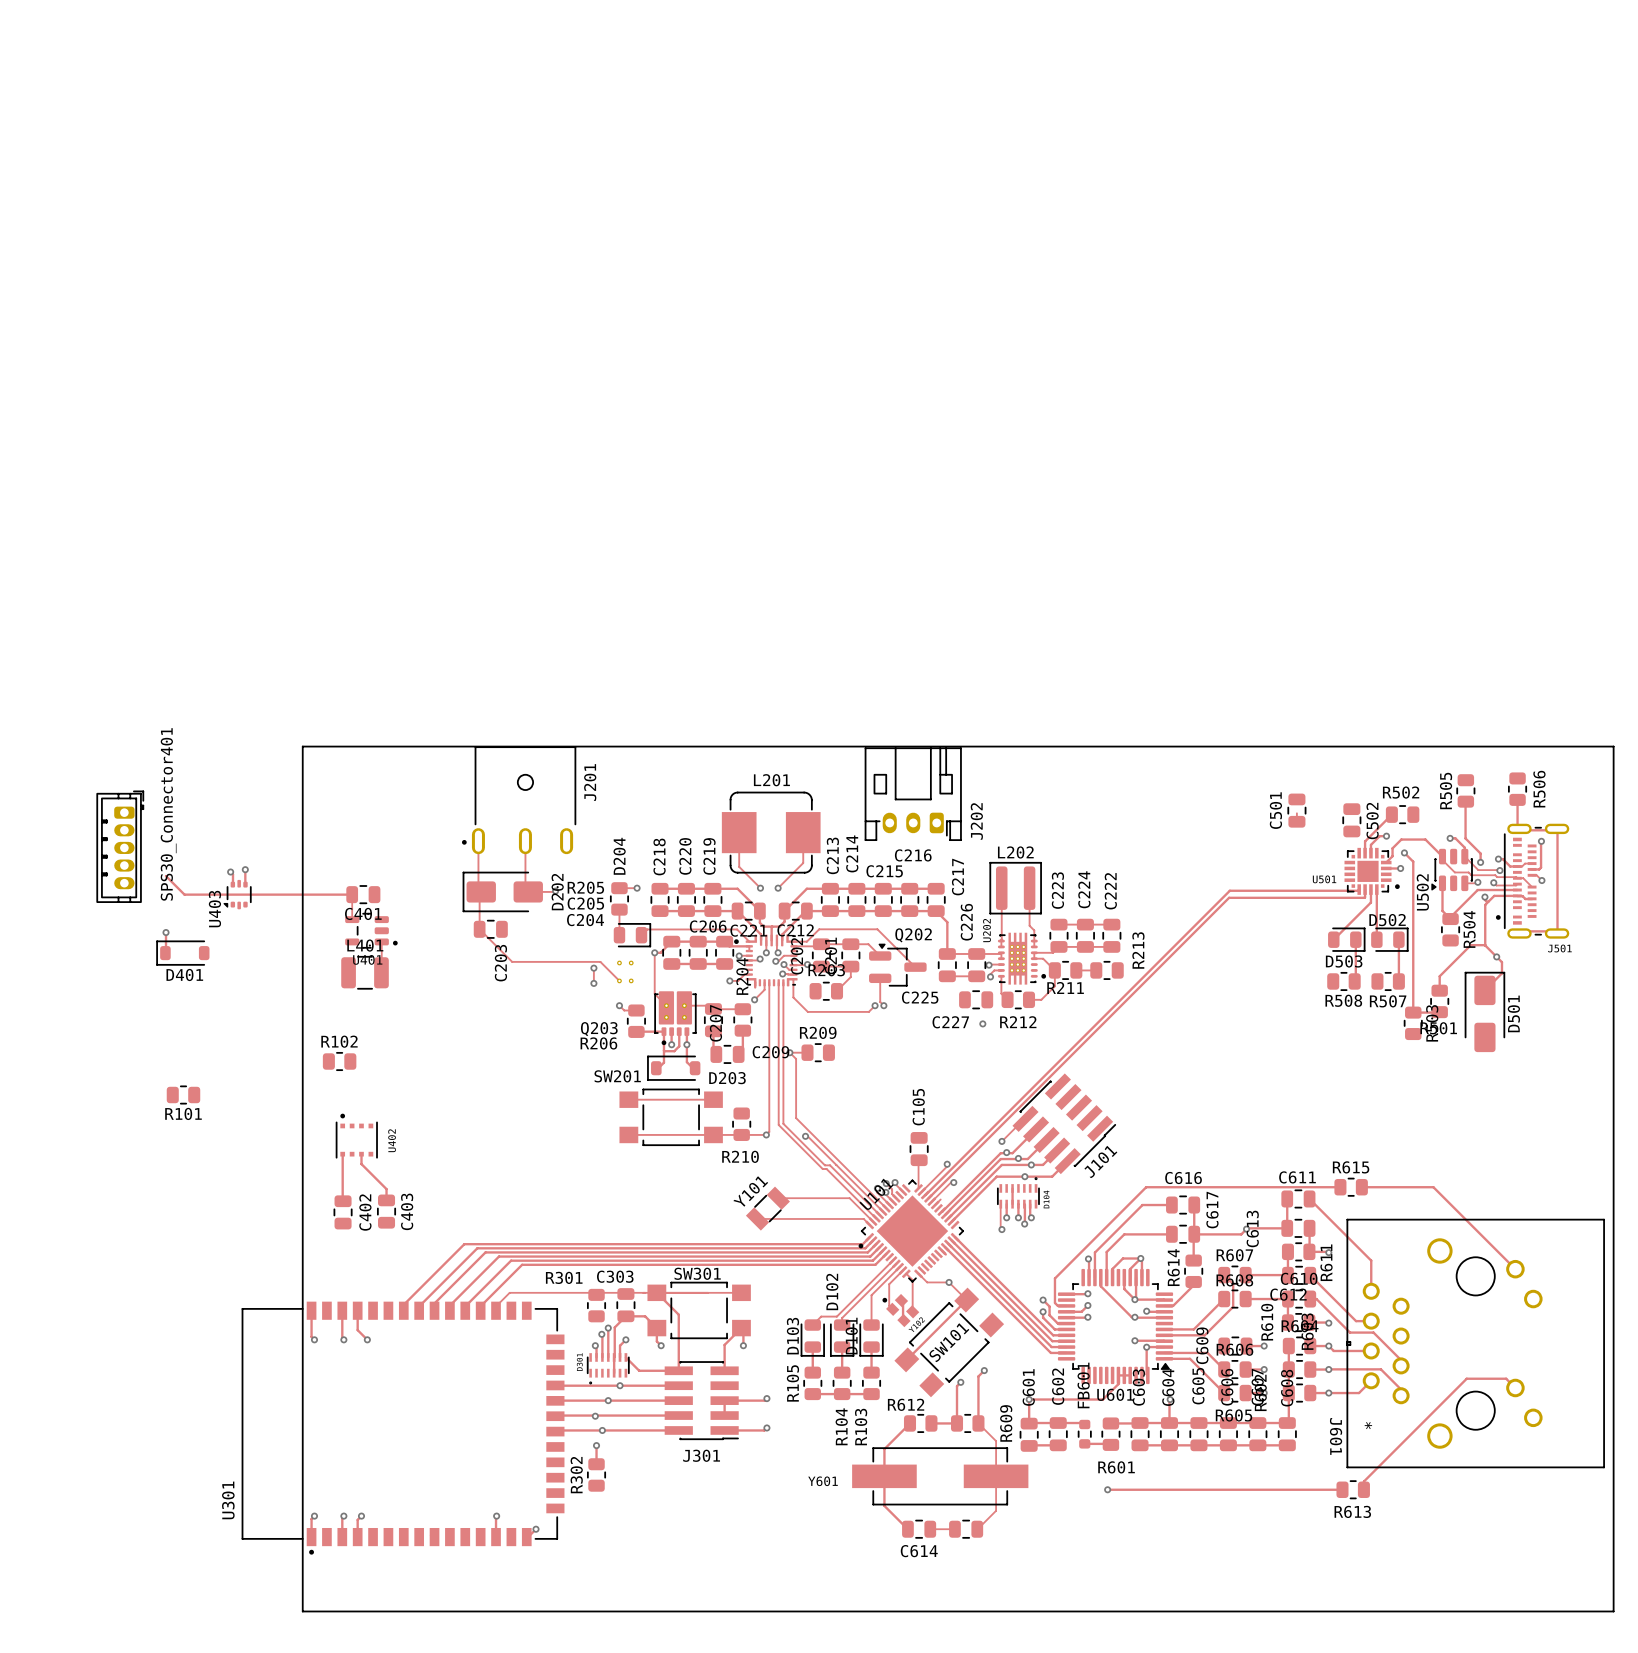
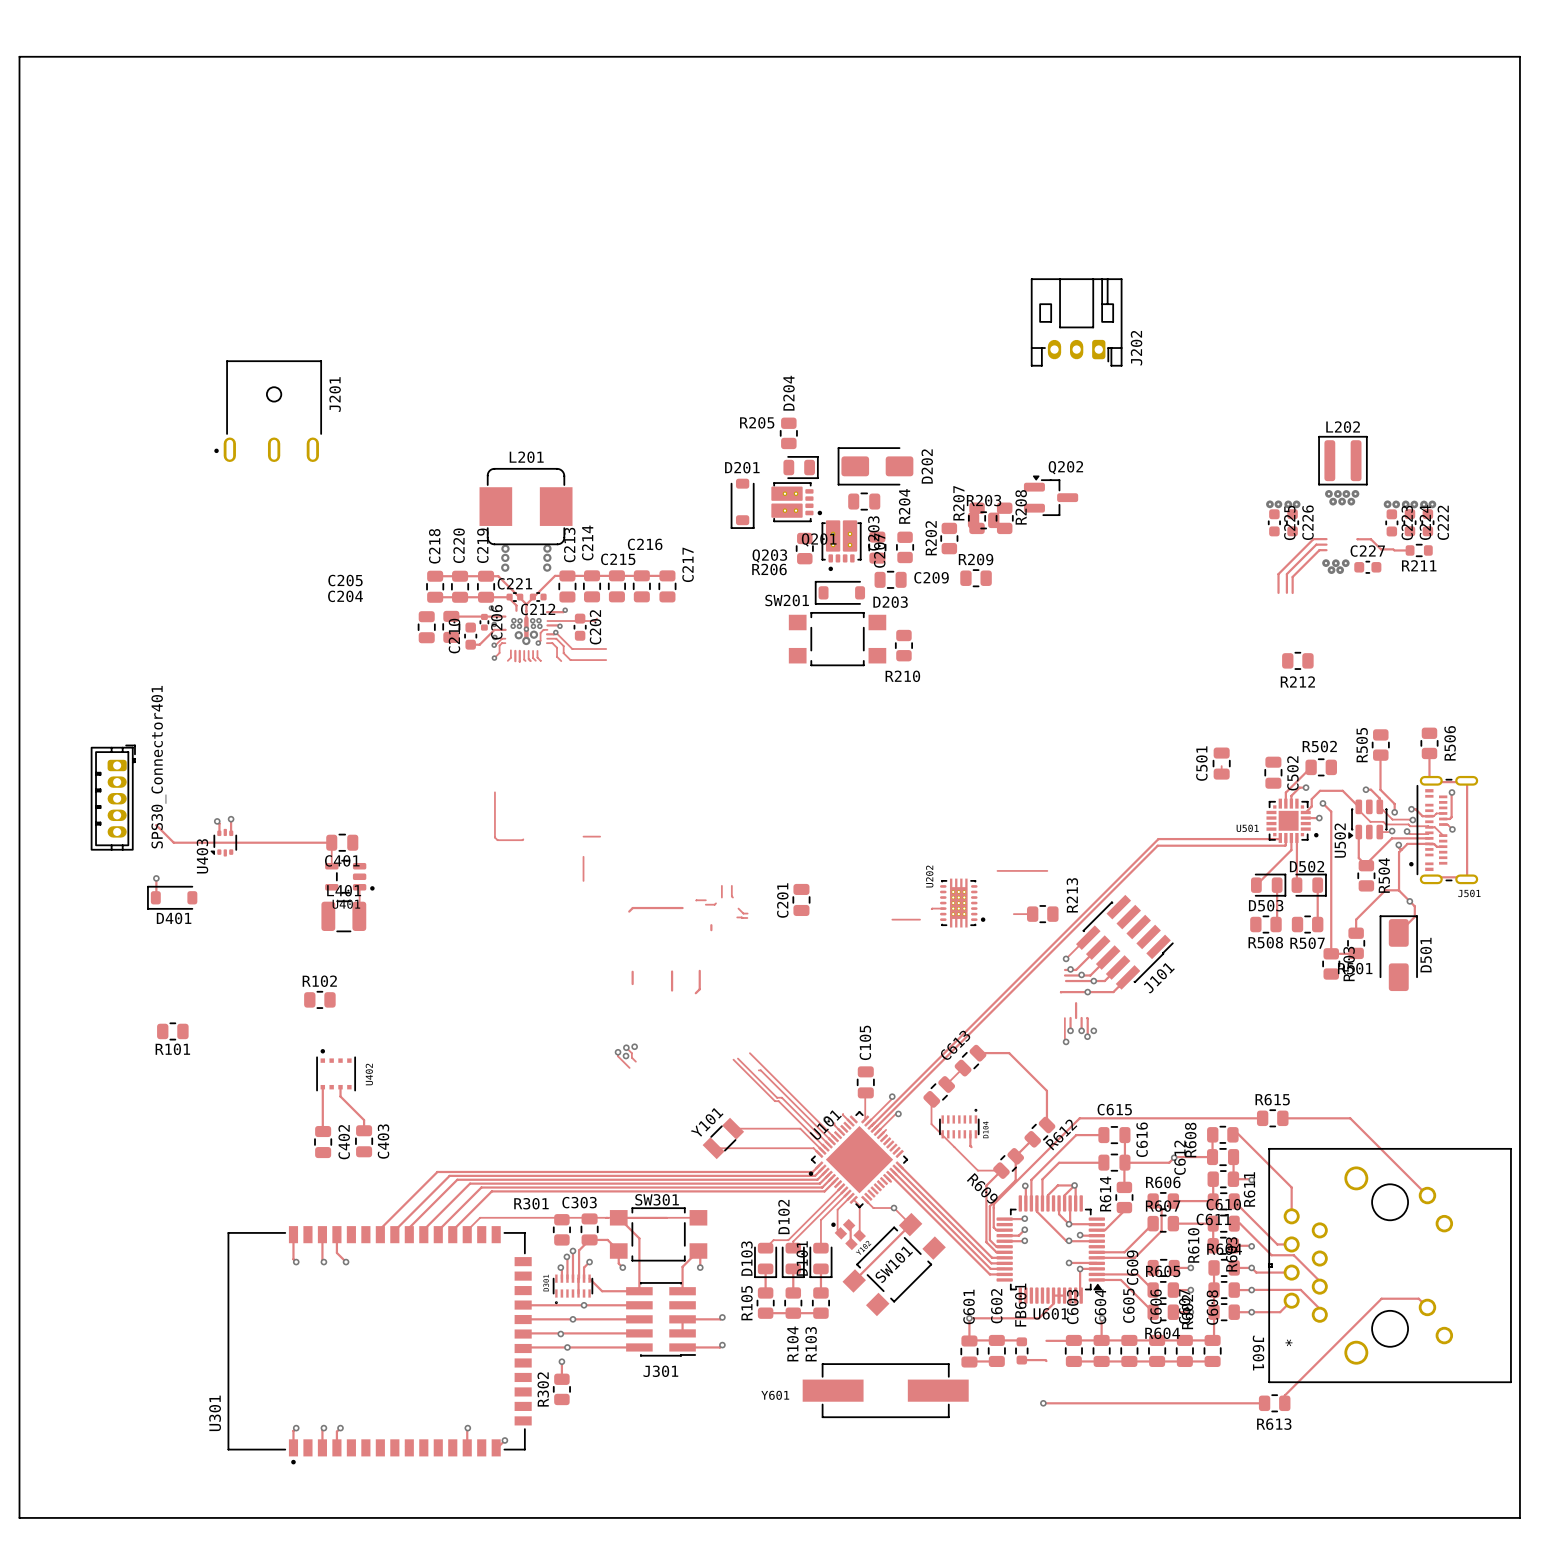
via: none -> (1328, 493)
via: none -> (1337, 493)
via: none -> (1346, 493)
via: none -> (1355, 493)
via: none -> (1333, 501)
via: none -> (1342, 501)
via: none -> (1351, 501)
Q201: none -> (796, 502)
D201: none -> (742, 503)
via: none -> (1269, 504)
via: none -> (1278, 504)
via: none -> (1288, 504)
via: none -> (1296, 504)
via: none -> (1387, 504)
via: none -> (1396, 504)
via: none -> (1405, 504)
via: none -> (1414, 504)
via: none -> (1424, 504)
via: none -> (1432, 504)
R207: none -> (977, 518)
R208: none -> (1004, 518)
R202: none -> (949, 538)
track: none -> (1326, 539) (1313, 539) (1278, 574) (1278, 592)
track: none -> (1357, 539) (1370, 539) (1381, 549) (1410, 550)
track: none -> (1326, 544) (1316, 544) (1286, 574) (1286, 592)
via: none -> (505, 548)
via: none -> (547, 548)
track: none -> (1326, 550) (1319, 550) (1292, 576) (1292, 592)
via: none -> (505, 557)
via: none -> (547, 557)
via: none -> (1326, 563)
via: none -> (1335, 563)
via: none -> (1345, 563)
via: none -> (505, 567)
via: none -> (547, 567)
via: none -> (1331, 570)
via: none -> (1340, 570)
track: none -> (435, 576) (498, 576) (526, 604)
track: none -> (667, 576) (555, 575) (526, 604) (526, 640)
track: none -> (435, 597) (508, 597) (516, 605) (516, 610)
via: none -> (491, 608)
track: none -> (565, 610) (563, 612) (547, 612)
via: none -> (565, 610)
track: none -> (451, 616) (505, 616)
track: none -> (597, 618) (594, 621) (547, 621)
via: none -> (513, 620)
via: none -> (538, 620)
via: none -> (520, 620)
via: none -> (532, 620)
via: none -> (494, 624)
track: none -> (547, 625) (559, 626)
via: none -> (513, 626)
via: none -> (519, 626)
via: none -> (533, 626)
via: none -> (539, 626)
via: none -> (559, 626)
via: none -> (526, 629)
track: none -> (505, 629) (494, 629) (479, 644) (470, 644)
track: none -> (547, 629) (543, 629) (540, 632) (540, 640) (538, 643)
via: none -> (555, 632)
via: none -> (533, 634)
track: none -> (547, 634) (555, 632) (572, 649) (606, 649)
via: none -> (518, 635)
C210: none -> (470, 636)
via: none -> (494, 637)
track: none -> (505, 638) (502, 638) (494, 645)
track: none -> (547, 638) (556, 638) (563, 646) (563, 653)
via: none -> (526, 640)
track: none -> (505, 643) (499, 645) (499, 652) (494, 658)
via: none -> (538, 643)
track: none -> (546, 643) (552, 643) (557, 647) (557, 656) (561, 661)
via: none -> (494, 645)
track: none -> (510, 650) (510, 657) (507, 660)
track: none -> (515, 650) (515, 661)
track: none -> (519, 650) (519, 661)
track: none -> (524, 650) (525, 660)
track: none -> (528, 650) (528, 659) (530, 661)
track: none -> (533, 650) (533, 658) (535, 660)
track: none -> (537, 650) (537, 657) (540, 660)
track: none -> (563, 653) (570, 660) (606, 660)
via: none -> (494, 658)
board edge: (1613, 746) (302, 746) (302, 1611) -> (1519, 703) (1519, 56) (19, 56) (19, 1517) (285, 1517)
J202 position: (913, 794) -> (1076, 322)
J201 position: (519, 800) -> (268, 411)
track: (739, 832) (739, 866) (760, 888) -> none
L201 position: (771, 832) -> (526, 506)
track: (803, 832) (803, 863) (778, 888) -> none
track: (478, 841) (478, 889) (481, 891) (479, 929) (512, 961) (600, 961) (619, 980) -> none
via: (637, 888) -> none
track: (660, 888) (737, 888) (759, 911) (759, 922) (763, 926) (779, 926) (784, 921) (784, 911) (806, 888) (936, 888) -> none
via: (760, 888) -> none
via: (778, 888) -> none
track: (1001, 888) (1001, 946) -> none
L202 position: (1015, 888) -> (1342, 460)
track: (1029, 888) (1029, 925) (1034, 930) (1034, 946) -> none
C224 name position: C224 (1084, 889) -> C224 (1425, 522)
C223 name position: C223 (1057, 890) -> C223 (1407, 522)
D202 position: (502, 891) -> (875, 466)
via: (555, 891) -> none
C222 name position: C222 (1110, 891) -> C222 (1443, 522)
R205 position: (619, 898) -> (788, 433)
C218 position: (660, 899) -> (435, 586)
C220 position: (686, 899) -> (460, 586)
C219 position: (712, 899) -> (486, 586)
C213 position: (830, 899) -> (567, 586)
C214 position: (856, 899) -> (592, 586)
C215 position: (883, 899) -> (616, 586)
C216 position: (909, 899) -> (641, 586)
C217 position: (936, 899) -> (667, 586)
C221 footprint: [731, 901, 766, 921] -> [506, 592, 524, 602]
C212 footprint: [778, 901, 813, 921] -> [529, 592, 547, 602]
track: (660, 911) (737, 911) (761, 934) (761, 940) -> none
C223 footprint: [1049, 918, 1069, 953] -> [1385, 509, 1399, 537]
C224 footprint: [1076, 918, 1095, 953] -> [1403, 509, 1417, 537]
C222 footprint: [1102, 918, 1122, 953] -> [1421, 509, 1435, 537]
C226 name position: C226 (966, 922) -> C226 (1308, 522)
C206 name position: C206 (708, 926) -> C206 (496, 622)
track: (772, 926) (771, 940) -> none
C203 position: (490, 929) -> (864, 501)
C221 name position: C221 (748, 930) -> C221 (514, 583)
D204 position: (632, 935) -> (800, 467)
track: (641, 935) (647, 929) (737, 929) (749, 941) -> none
C206 footprint: [715, 935, 734, 970] -> [479, 613, 490, 631]
C202 footprint: [812, 938, 831, 973] -> [573, 613, 587, 641]
track: (782, 940) (782, 934) (805, 911) (936, 911) (947, 922) (947, 953) (1001, 952) (1001, 958) -> none
track: (793, 941) (806, 941) (819, 929) (877, 929) (915, 967) -> none
track: (1111, 946) (1058, 946) (1053, 952) (1034, 952) (1034, 958) (1043, 958) (1054, 970) (1054, 986) (1041, 999) (1029, 999) -> none
C225 footprint: [937, 948, 957, 983] -> [1268, 509, 1281, 537]
C226 footprint: [967, 948, 987, 983] -> [1286, 509, 1299, 537]
track: (749, 951) (749, 946) (729, 946) (724, 941) (671, 941) (660, 952) (654, 952) (654, 993) (666, 1005) -> none
track: (793, 951) (793, 946) (868, 944) (880, 955) -> none
via: (654, 952) -> none
C204 position: (671, 952) -> (426, 627)
C205 position: (698, 952) -> (451, 626)
via: (766, 952) -> none
via: (778, 952) -> none
via: (739, 955) -> none
track: (793, 955) (784, 955) (775, 961) -> none
C202 name position: C202 (797, 956) -> C202 (595, 627)
via: (760, 959) -> none
part: (765, 960) -> none
via: (775, 961) -> none
R211 footprint: [1048, 961, 1083, 980] -> [1405, 544, 1433, 557]
via: (783, 964) -> none
track: (807, 964) (793, 965) -> none
via: (807, 964) -> none
Q202 position: (897, 965) -> (1051, 495)
via: (989, 965) -> none
track: (821, 966) (850, 966) (850, 977) (837, 991) -> none
track: (593, 968) (593, 983) -> none
via: (593, 968) -> none
track: (1001, 970) (994, 970) (990, 976) -> none
part: (625, 971) -> none
via: (782, 973) -> none
track: (749, 974) (744, 974) (738, 980) (729, 980) -> none
via: (990, 976) -> none
track: (1001, 976) (1001, 993) (1007, 999) -> none
track: (880, 978) (880, 1002) (883, 1005) -> none
track: (793, 979) (793, 997) (807, 1011) (868, 1011) (875, 1005) -> none
via: (729, 980) -> none
track: (764, 982) (764, 989) (754, 999) -> none
track: (769, 982) (769, 1132) (766, 1134) (628, 1134) -> none
track: (778, 982) (778, 1124) -> none
track: (783, 982) (783, 1123) -> none
via: (593, 983) -> none
C227 footprint: [959, 990, 994, 1010] -> [1354, 560, 1382, 574]
R203 position: (826, 991) -> (983, 520)
C225 name position: C225 (920, 997) -> C225 (1289, 522)
via: (754, 999) -> none
R212 position: (1018, 999) -> (1297, 660)
track: (619, 1005) (624, 1010) (636, 1010) -> none
via: (619, 1005) -> none
track: (684, 1005) (707, 1005) (713, 1009) (742, 1009) -> none
via: (875, 1005) -> none
via: (883, 1005) -> none
track: none -> (1098, 947) (1076, 969) (1065, 969)
track: none -> (1108, 957) (1090, 975) (1065, 975)
via: none -> (1066, 958)
Q203 position: (675, 1018) -> (841, 545)
R204 position: (742, 1019) -> (905, 547)
C207 position: (713, 1020) -> (877, 547)
R206 position: (636, 1021) -> (804, 548)
C227 name position: C227 (950, 1022) -> C227 (1367, 551)
via: (982, 1023) -> none
track: none -> (1118, 967) (1104, 981) (1066, 981)
via: none -> (1070, 969)
track: (636, 1031) (663, 1031) (663, 1062) (656, 1068) -> none
track: (679, 1031) (679, 1046) (674, 1051) (663, 1050) -> none
track: (686, 1031) (686, 1062) (695, 1068) -> none
via: none -> (1081, 974)
track: none -> (1128, 977) (1113, 992) (1060, 992)
via: none -> (1093, 981)
via: (671, 1044) -> none
via: (686, 1044) -> none
via: (789, 1052) -> none
track: (807, 1052) (789, 1052) (796, 1058) (796, 1118) -> none
R209 position: (818, 1052) -> (976, 578)
via: none -> (1087, 992)
C209 position: (727, 1054) -> (890, 579)
D203 position: (673, 1068) -> (840, 592)
via: none -> (1070, 1030)
via: none -> (1081, 1030)
via: none -> (1093, 1030)
track: (628, 1099) (713, 1099) -> none
via: none -> (1087, 1036)
via: none -> (1066, 1041)
via: none -> (634, 1046)
via: none -> (626, 1047)
via: none -> (618, 1052)
SW201 position: (671, 1117) -> (837, 639)
track: none -> (978, 1053) (1009, 1053) (1046, 1090) (1046, 1124)
track: (1025, 1118) (1001, 1141) -> (1088, 937) (1066, 958)
via: none -> (626, 1056)
J101 position: (1064, 1123) -> (1124, 942)
R210 position: (741, 1124) -> (903, 645)
C613: none -> (970, 1060)
track: (1036, 1129) (1012, 1153) (1000, 1153) (941, 1211) -> none
track: none -> (963, 1068) (946, 1084)
via: (766, 1134) -> none
via: (805, 1136) -> none
track: (1046, 1140) (1027, 1159) (1000, 1159) (945, 1215) -> none
via: (1001, 1141) -> none
track: (1057, 1150) (1043, 1164) (1001, 1164) (948, 1218) -> none
via: (1006, 1152) -> none
via: (1018, 1158) -> none
part: none -> (939, 1091)
track: (1067, 1161) (1052, 1176) (996, 1176) (951, 1221) -> none
via: (1031, 1164) -> none
via: (1024, 1176) -> none
C616 name: C616 (1183, 1178) -> C615 (1114, 1109)
via: (895, 1182) -> none
track: (886, 1183) (892, 1189) (892, 1194) (896, 1198) -> (626, 1047) (635, 1061)
via: (886, 1183) -> none
track: (877, 1188) (877, 1192) (889, 1205) -> (618, 1052) (618, 1056) (629, 1067)
track: (1012, 1188) (1012, 1204) -> (1076, 1003) (1076, 1018)
via: (885, 1192) -> none
C611: (1298, 1198) -> none
track: (1000, 1204) (1001, 1229) -> (1064, 1018) (1066, 1041)
track: (1006, 1204) (1006, 1217) -> (1070, 1018) (1070, 1030)
track: (1018, 1204) (1018, 1217) -> (1081, 1018) (1081, 1030)
track: (1024, 1204) (1024, 1224) -> (1087, 1018) (1087, 1036)
R608: none -> (1222, 1134)
C617 name: C617 (1212, 1210) -> C616 (1142, 1139)
via: (1006, 1217) -> none
via: (1018, 1217) -> none
via: (1031, 1217) -> none
via: (1024, 1224) -> none
via: (1001, 1229) -> none
C613 name: C613 (1252, 1229) -> C612 (1180, 1157)
R607 name: R607 (1234, 1255) -> R606 (1163, 1182)
R608 name: R608 (1234, 1280) -> R607 (1163, 1206)
C612 name: C612 (1288, 1294) -> C611 (1213, 1219)
track: (1043, 1300) (1049, 1306) (1050, 1316) -> (1032, 1139) (1015, 1156) (1015, 1180) (989, 1206) (989, 1240)
via: (1043, 1300) -> none
track: (1043, 1311) (1043, 1317) (1054, 1329) (1057, 1329) -> (931, 1099) (931, 1124) (977, 1170) (1001, 1170) (986, 1185) (986, 1242) (996, 1252)
via: (1043, 1311) -> none
R606 name: R606 (1234, 1349) -> R605 (1163, 1271)
track: (984, 1370) (978, 1376) (978, 1423) (996, 1441) (996, 1510) (977, 1529) -> none
via: (984, 1370) -> none
track: (960, 1382) (957, 1386) (957, 1423) (931, 1423) -> none
via: (960, 1382) -> none
R612 name position: R612 (906, 1404) -> R612 (1061, 1134)
R605 name: R605 (1234, 1415) -> R604 (1162, 1333)
track: (910, 1423) (884, 1449) (884, 1505) (907, 1529) -> none
R612 rotation: 0° (920, 1423) -> 45° counterclockwise (1039, 1132)
R612 position: (920, 1423) -> (1039, 1132)
R609 rotation: 0° (967, 1423) -> 45° counterclockwise (1008, 1163)
R609 position: (967, 1423) -> (1008, 1163)
R609 name position: R609 (1006, 1423) -> R609 (982, 1188)
R601: (1110, 1434) -> none
C614: (919, 1529) -> none
track: (930, 1529) (954, 1529) -> none
part: (966, 1529) -> none

